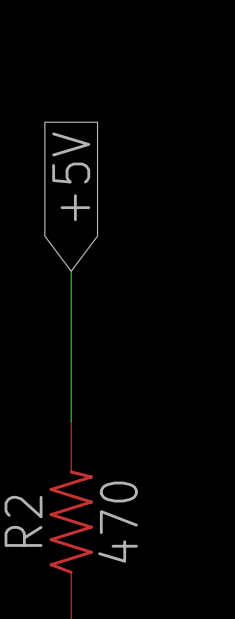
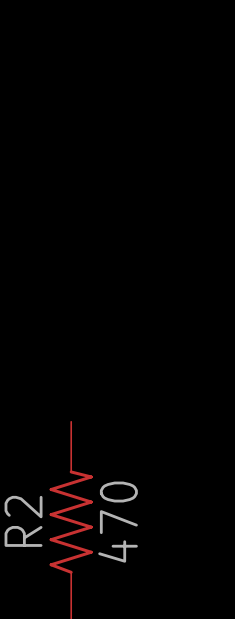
global label: +5V (71, 176) -> none
wire: (71, 271) (71, 421) -> none

